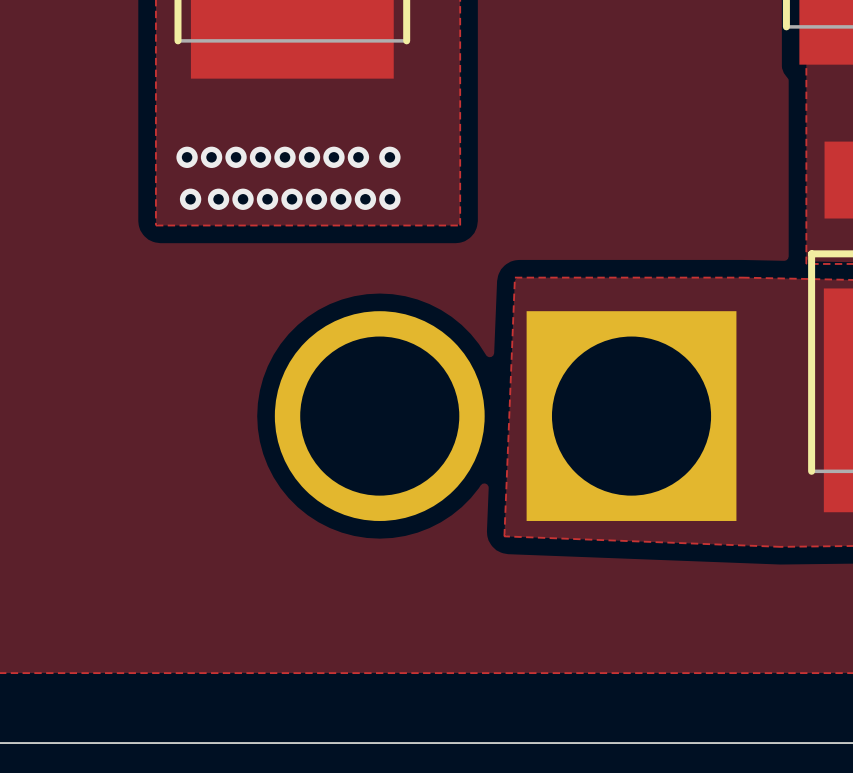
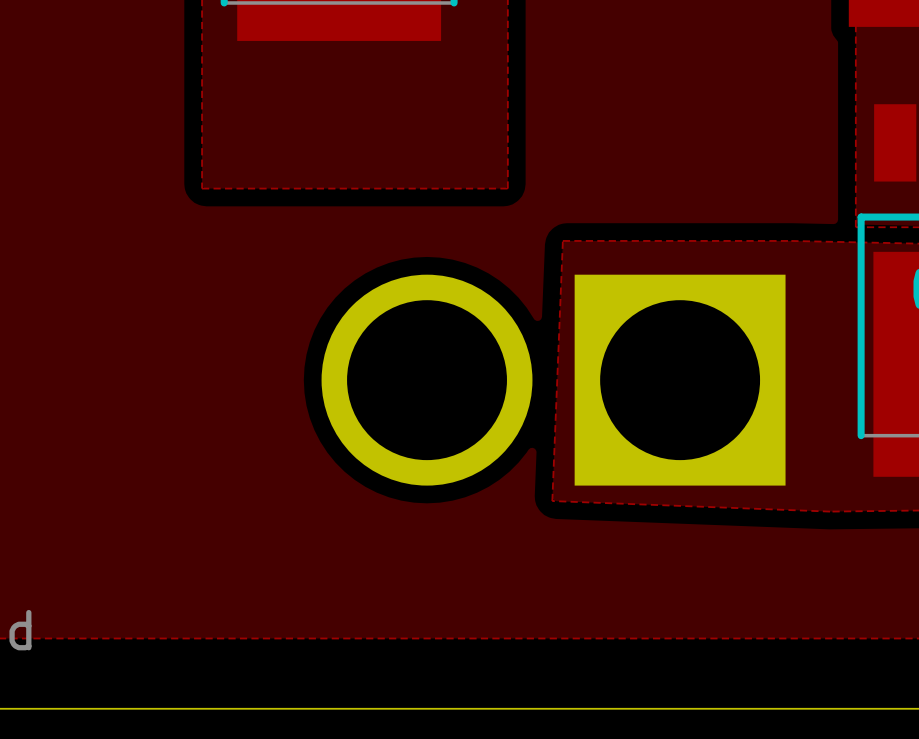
via: (187, 157) -> none
via: (211, 157) -> none
via: (236, 157) -> none
via: (260, 157) -> none
via: (284, 157) -> none
via: (309, 157) -> none
via: (333, 157) -> none
via: (358, 157) -> none
via: (389, 157) -> none
via: (190, 199) -> none
via: (218, 199) -> none
via: (243, 199) -> none
via: (267, 199) -> none
via: (291, 199) -> none
via: (316, 199) -> none
via: (340, 199) -> none
via: (365, 199) -> none
via: (389, 199) -> none

